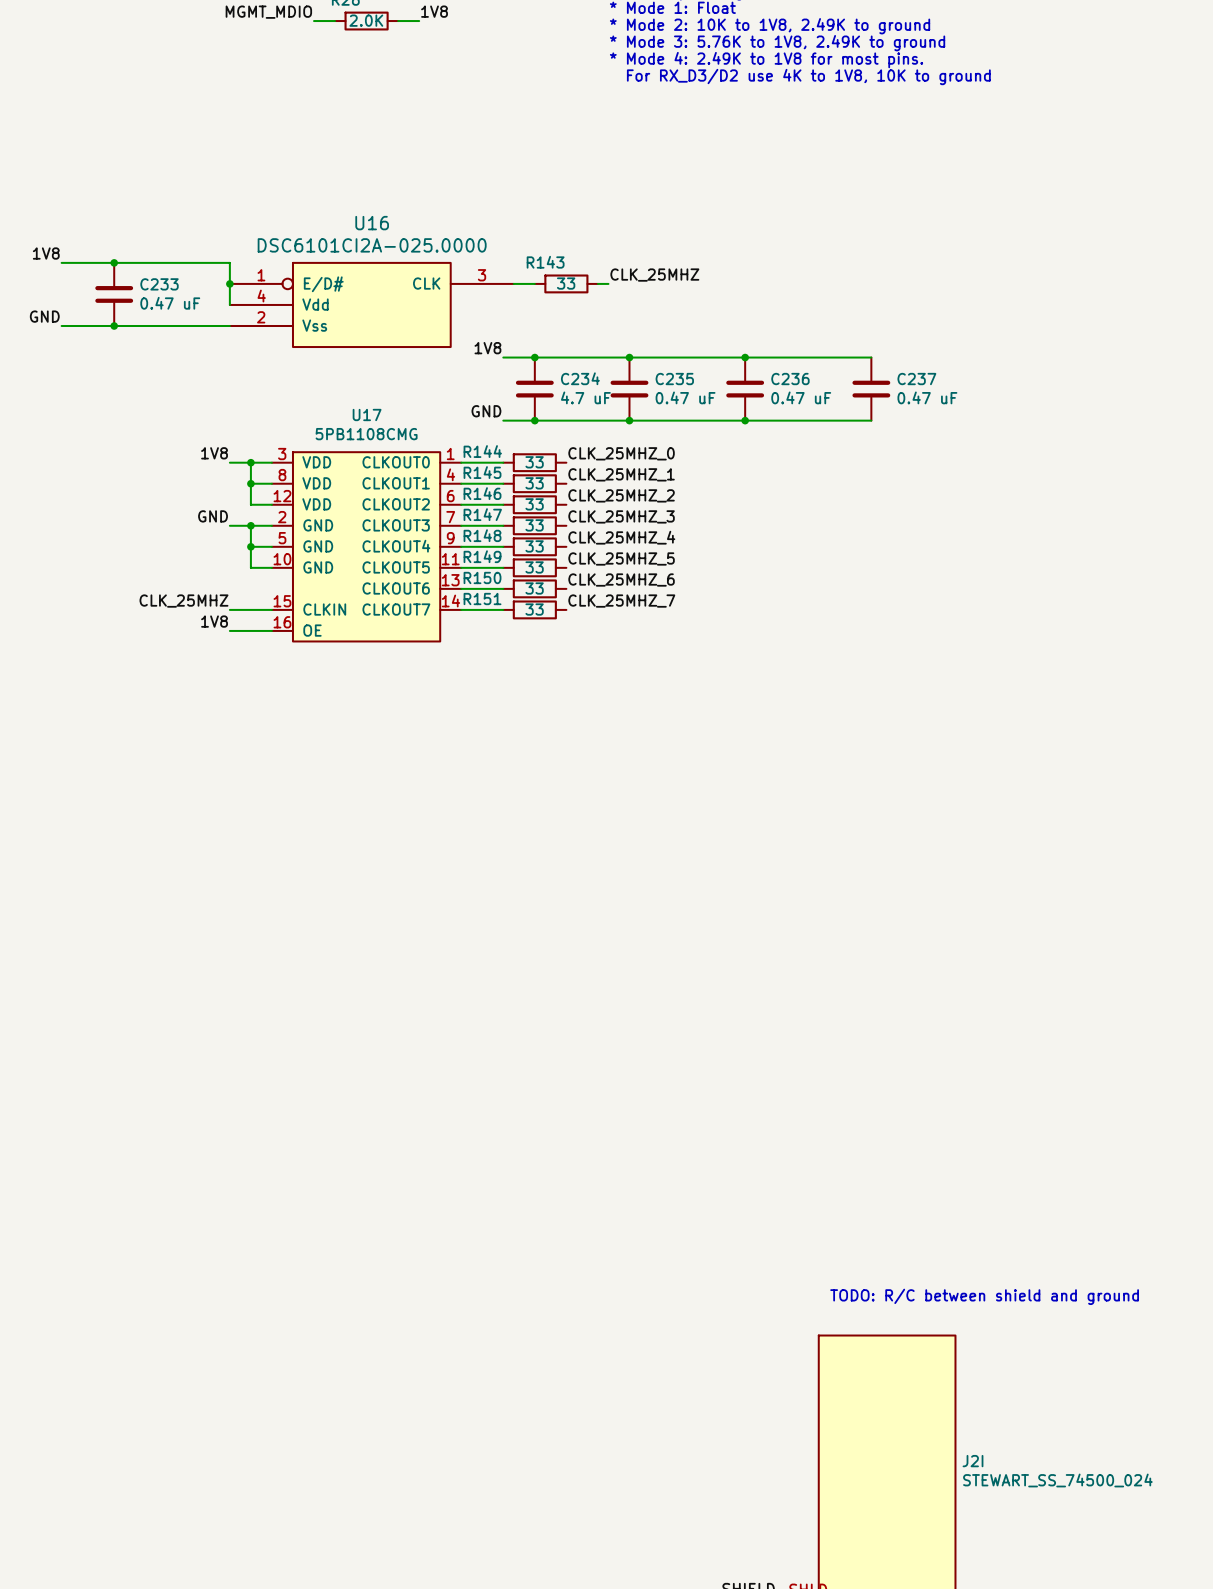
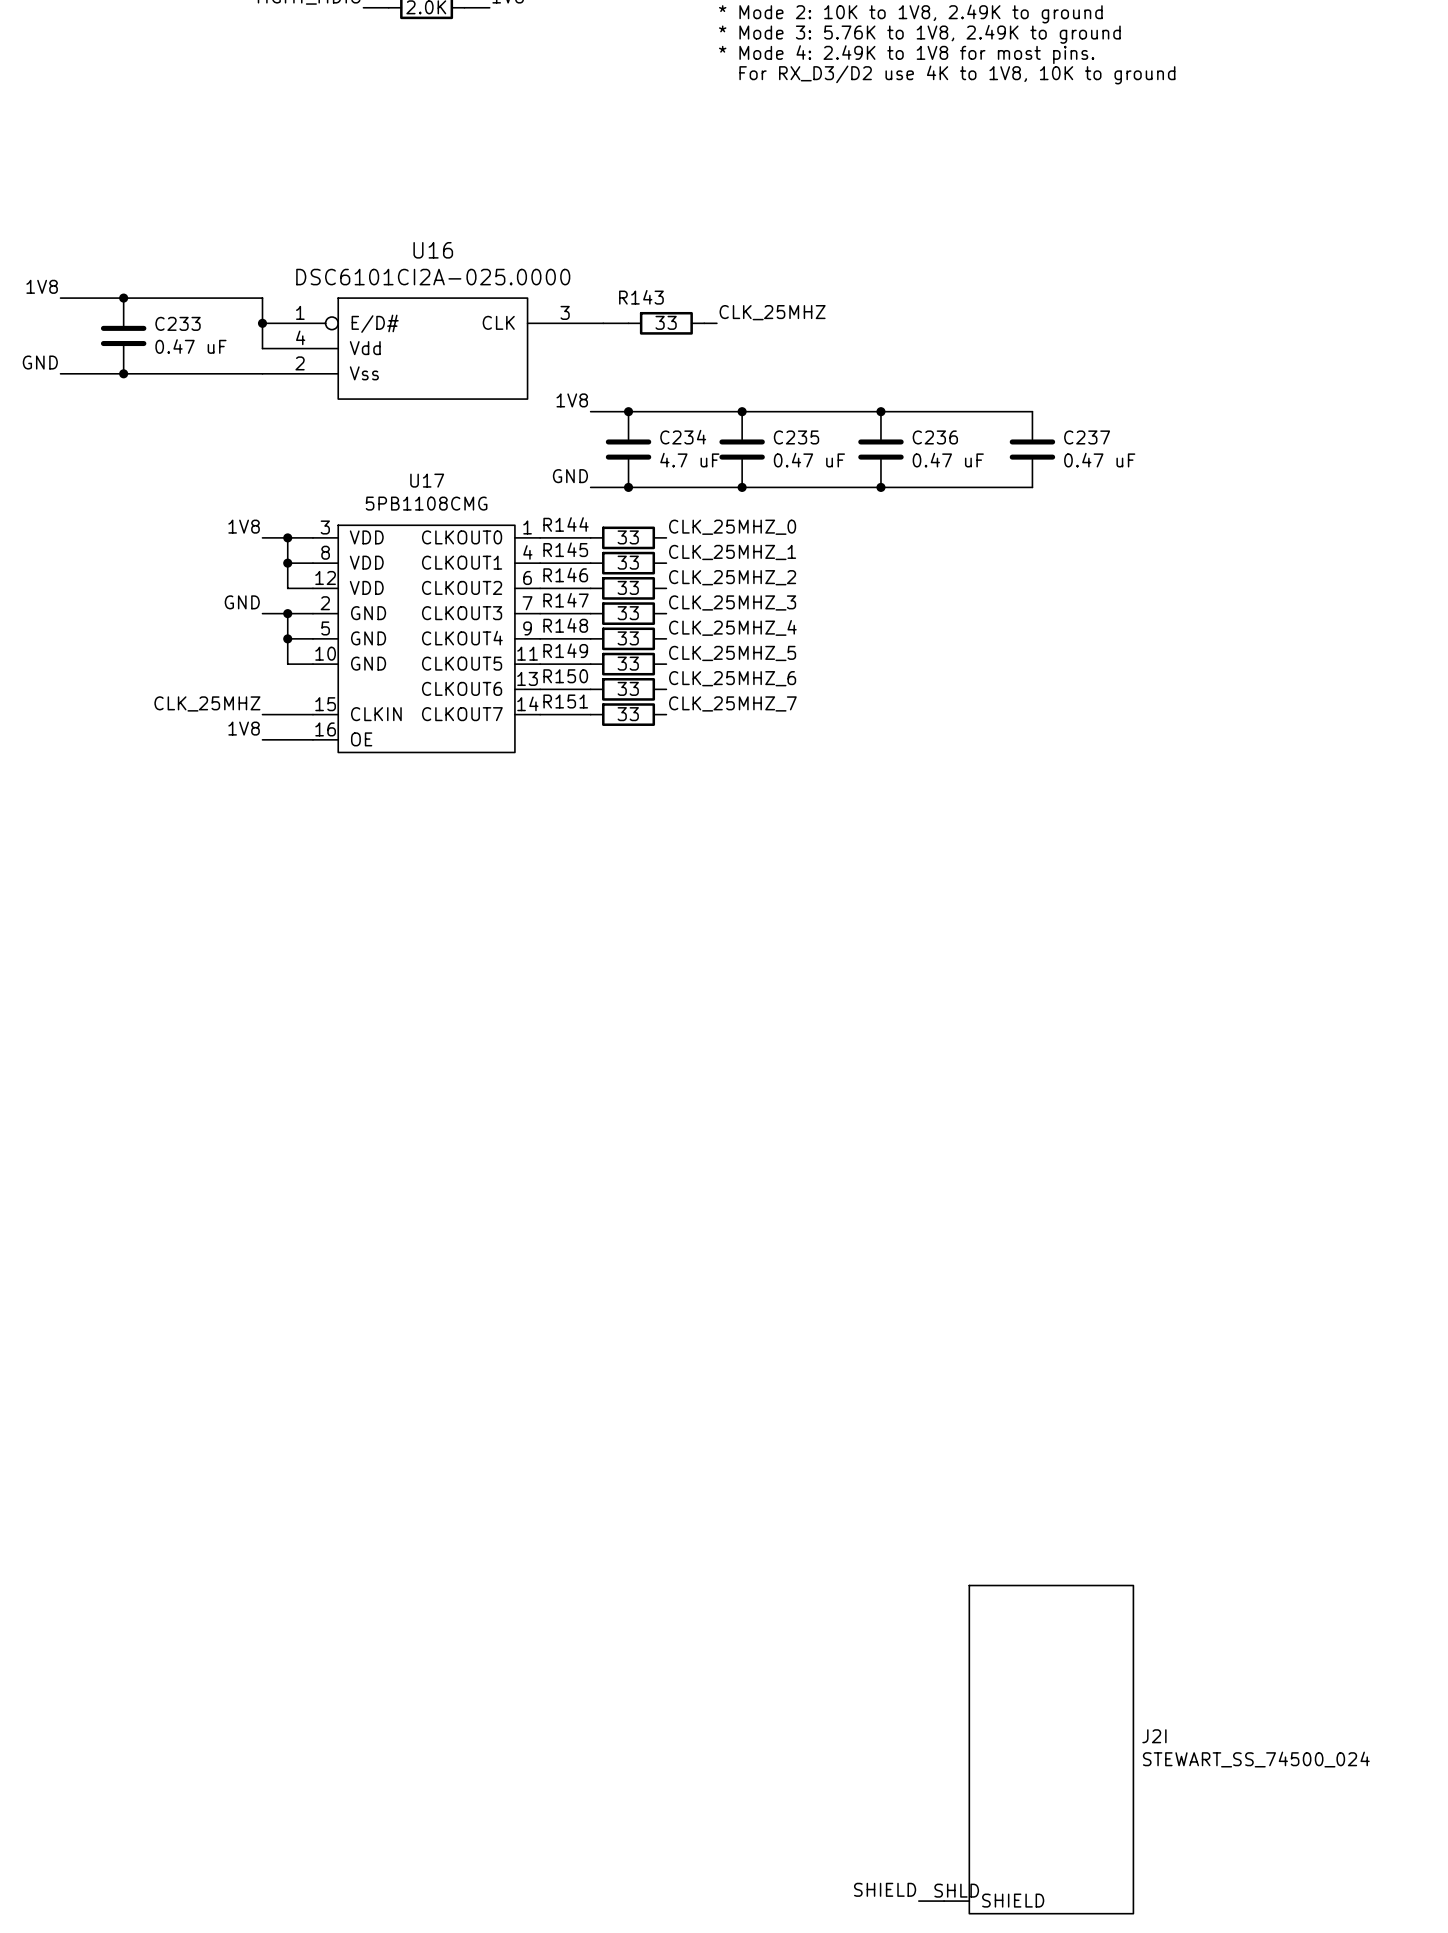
text: TODO: R/C between shield and ground (984, 1296) -> none

